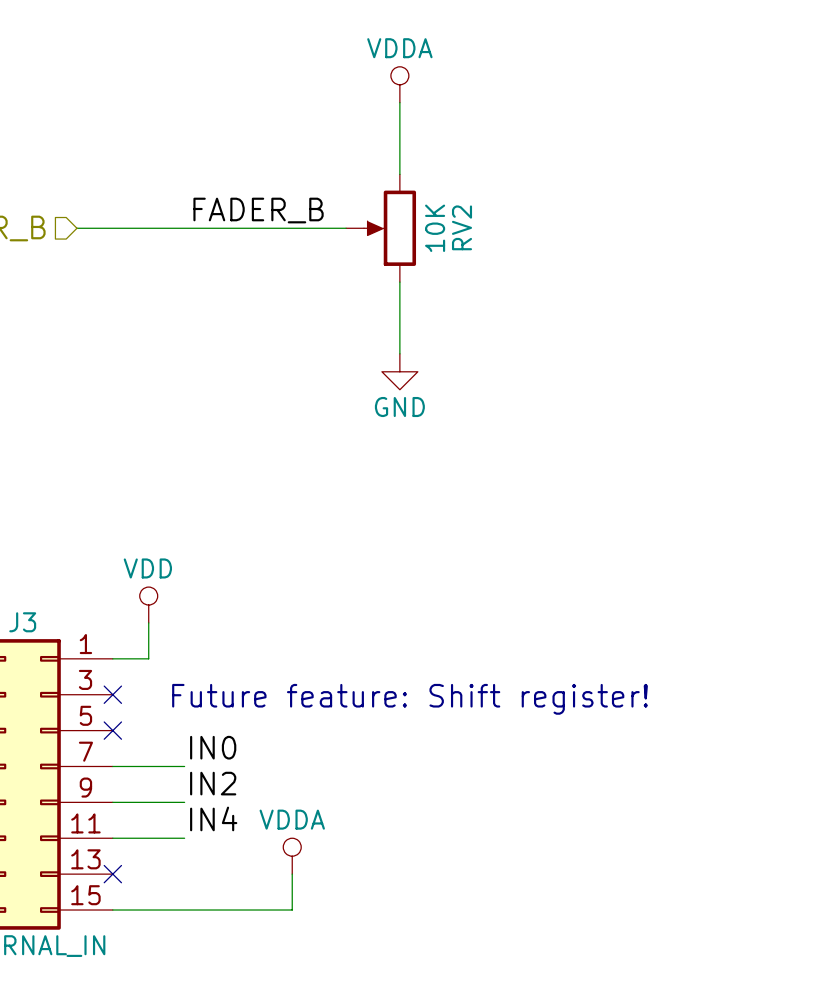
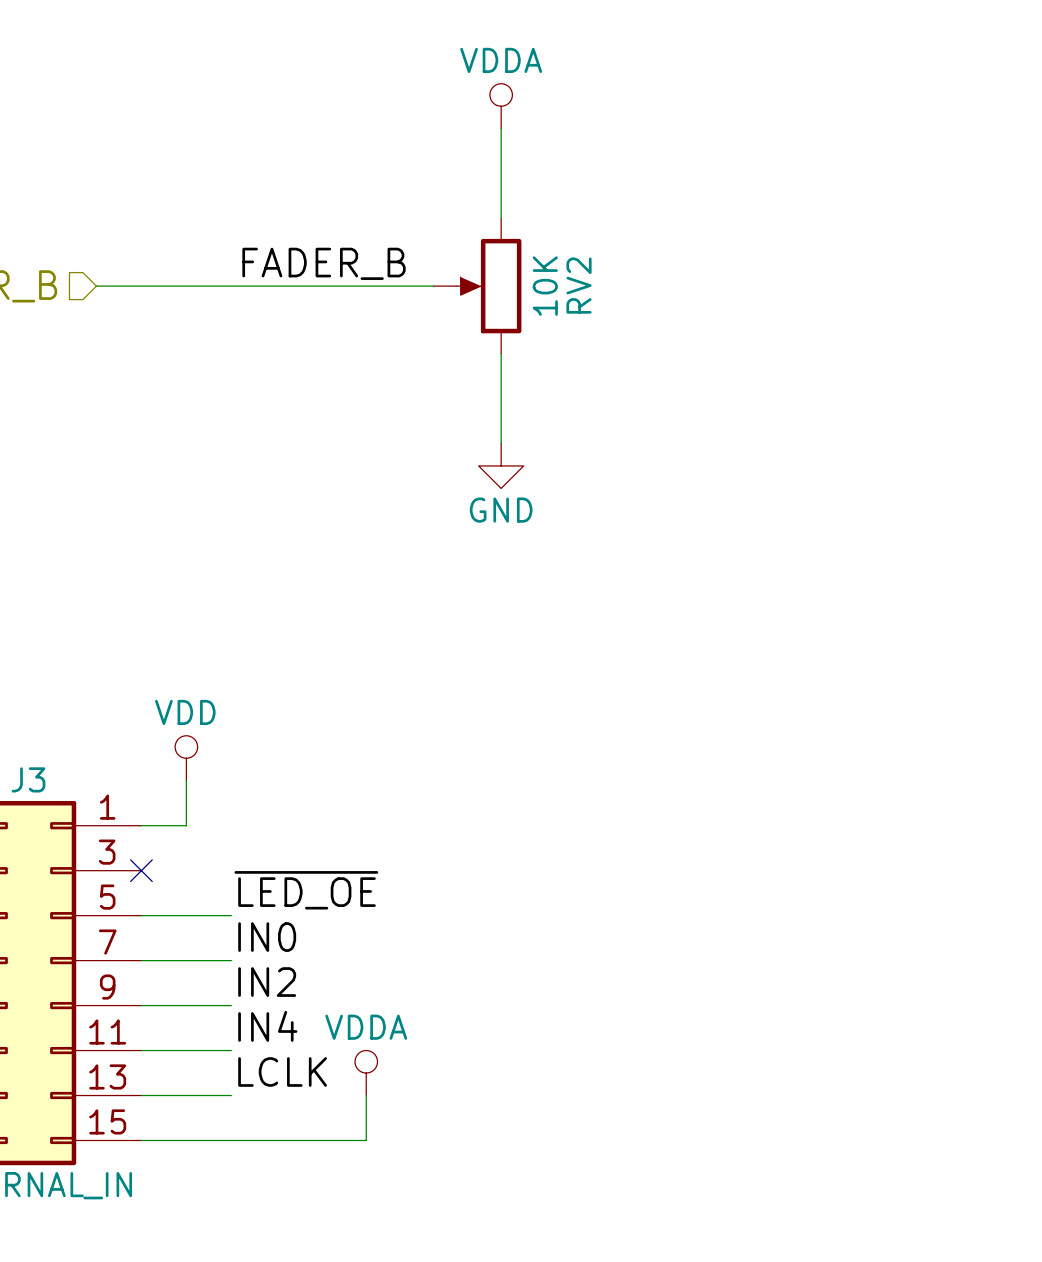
text: Future feature: Shift register! (410, 699) -> none
label: none -> ~{LED_OE} (306, 890)
wire: none -> (141, 915) (231, 915)
no-connect mark: (112, 730) -> none
label: none -> LCLK (282, 1071)
wire: none -> (141, 1095) (231, 1095)
no-connect mark: (112, 874) -> none

